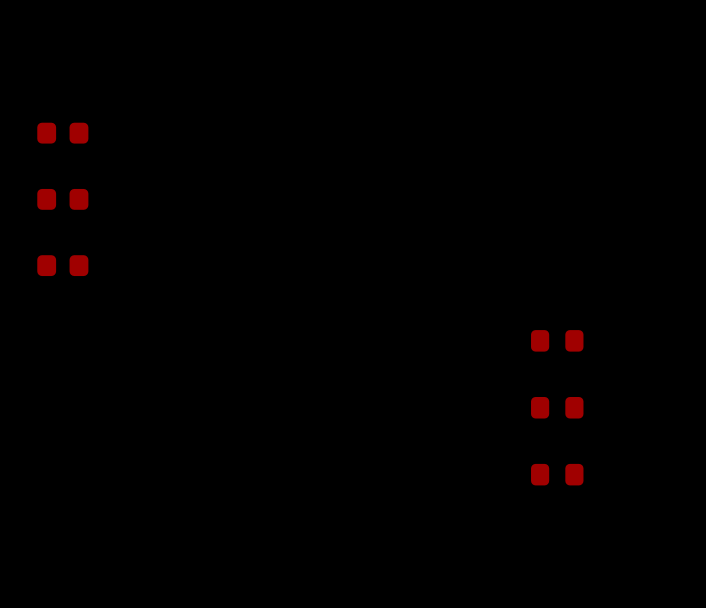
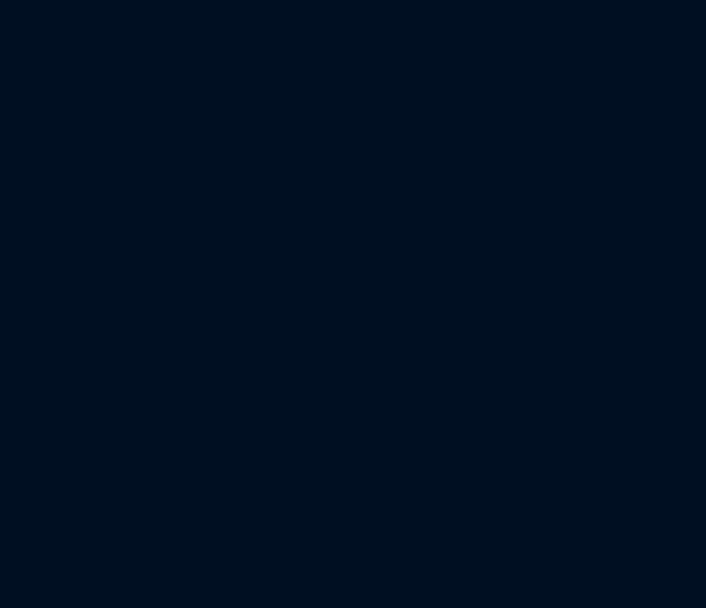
part: (62, 133) -> none
part: (62, 199) -> none
part: (62, 265) -> none
part: (557, 340) -> none
part: (557, 407) -> none
part: (557, 474) -> none

